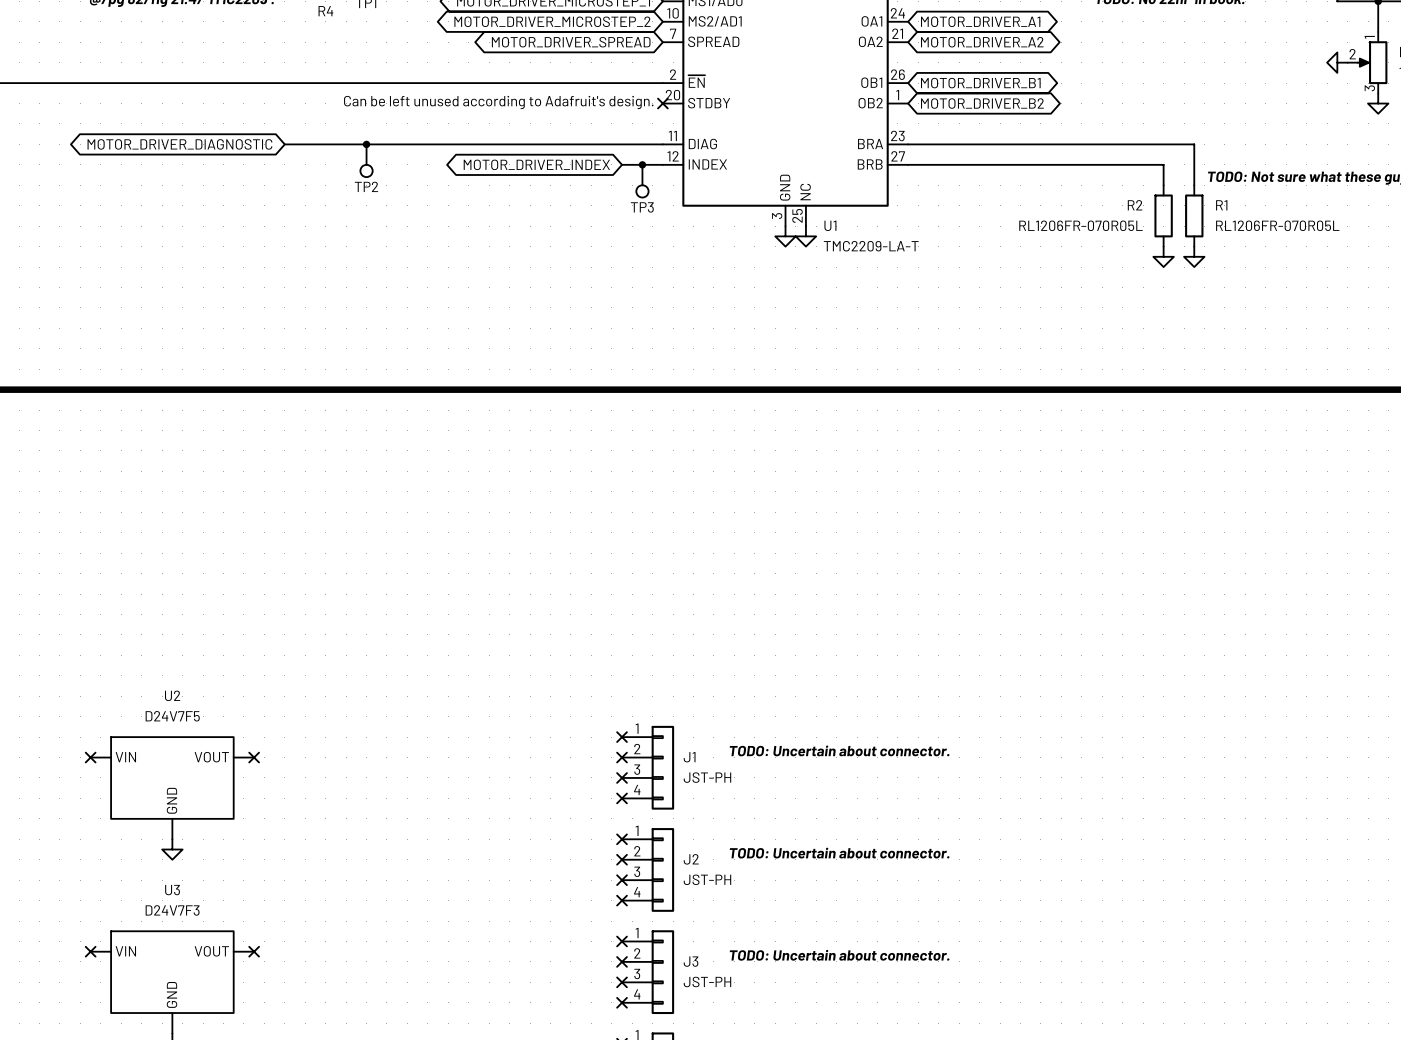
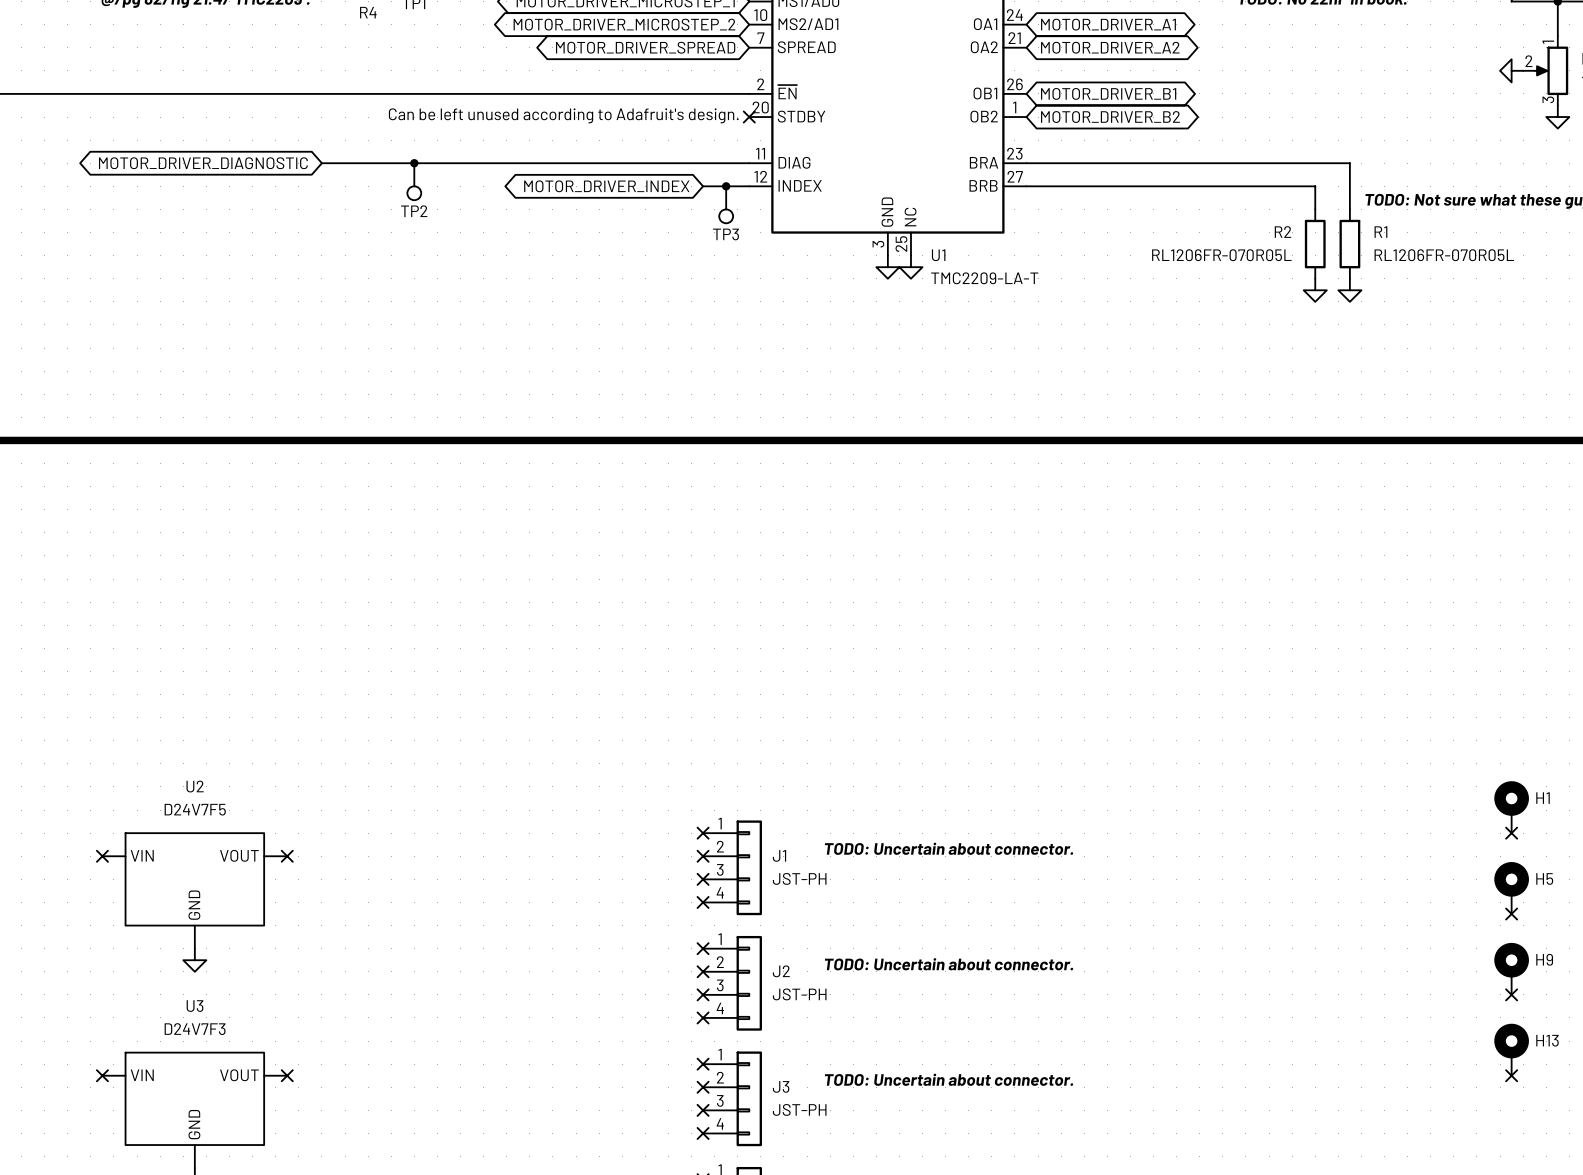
H1: none -> (1511, 807)
no-connect mark: none -> (1511, 833)
H5: none -> (1511, 888)
no-connect mark: none -> (1511, 914)
H9: none -> (1511, 968)
no-connect mark: none -> (1511, 994)
H13: none -> (1511, 1049)
no-connect mark: none -> (1511, 1075)

